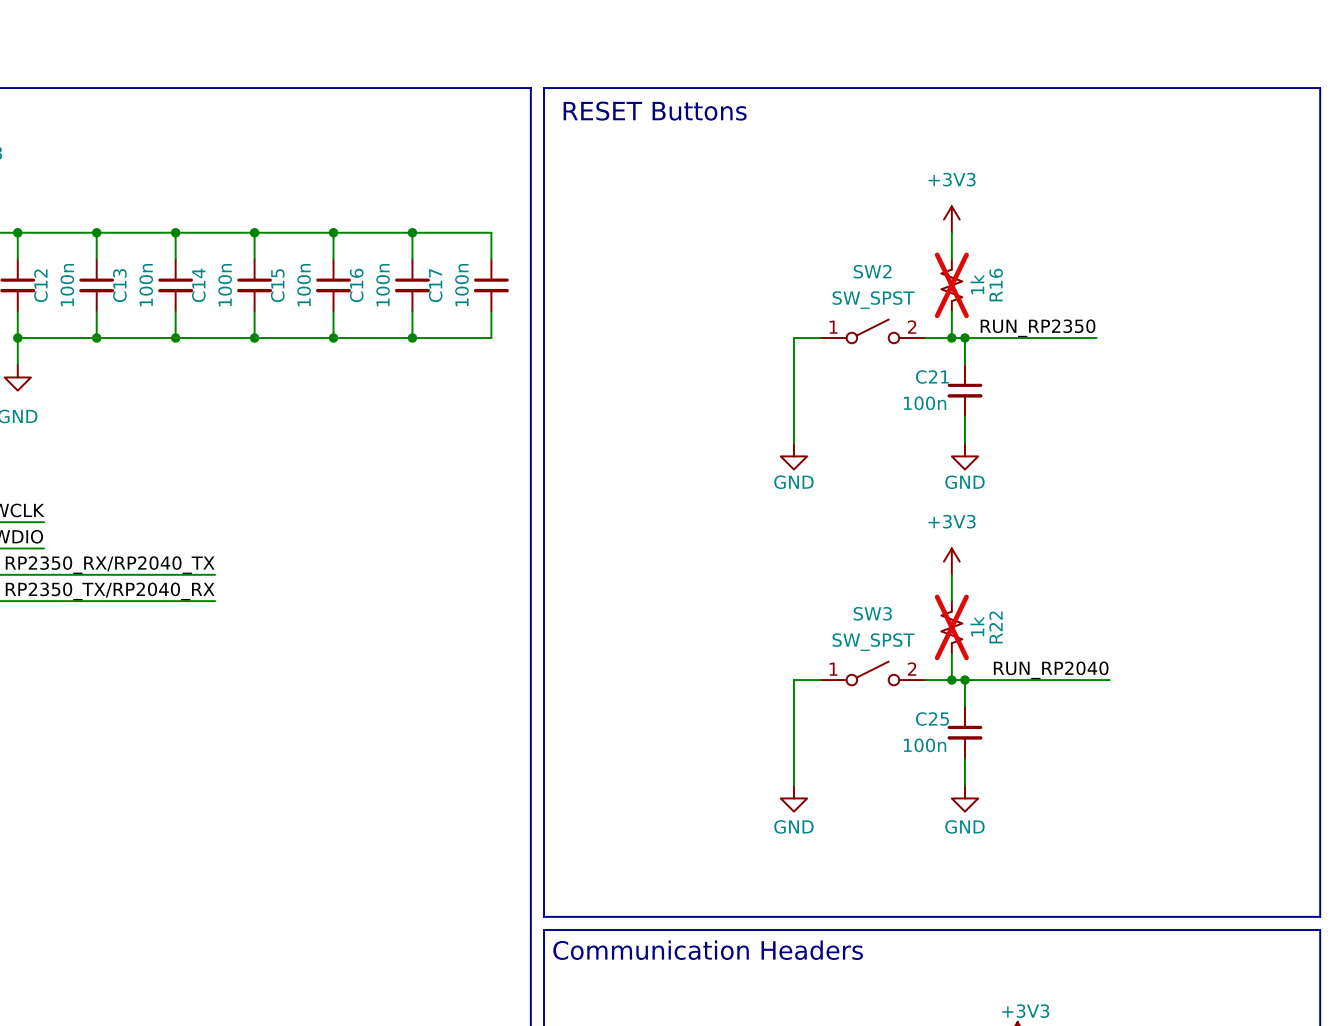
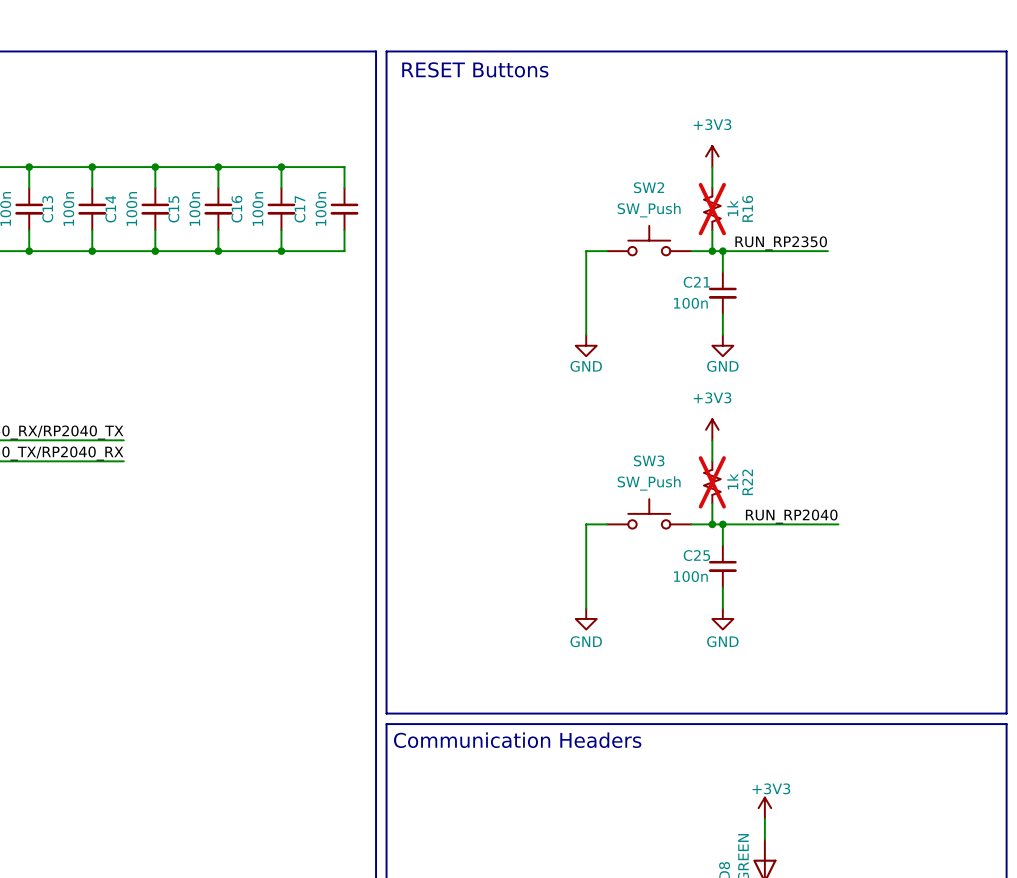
SW2 value: SW_SPST (873, 300) -> SW_Push (649, 210)
SW2 symbol: [820, 319, 926, 344] -> [607, 225, 692, 256]
SW3 value: SW_SPST (873, 642) -> SW_Push (649, 483)
SW3 symbol: [820, 661, 926, 686] -> [607, 499, 692, 529]

